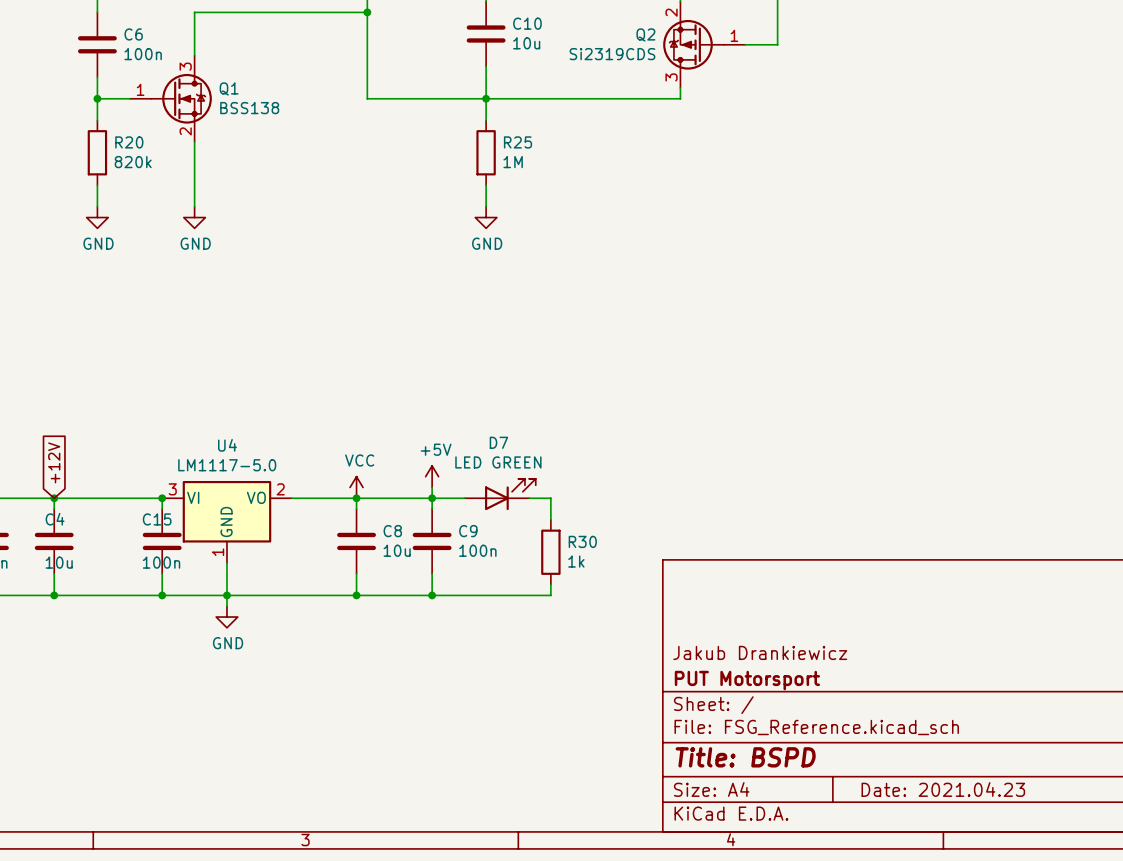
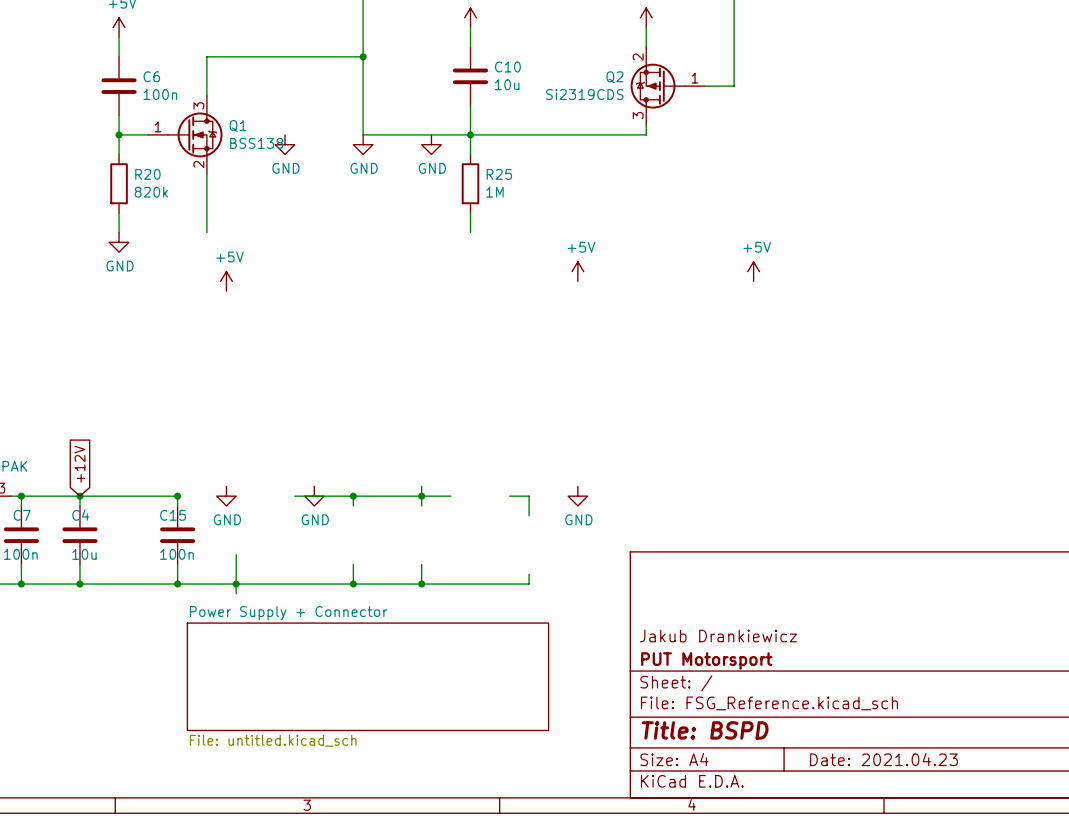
power symbol: none -> GND (285, 144)
power symbol: none -> GND (363, 144)
power symbol: none -> GND (431, 144)
power symbol: GND (194, 217) -> none
power symbol: GND (486, 217) -> none
power symbol: none -> +5V (577, 271)
power symbol: none -> +5V (753, 271)
power symbol: none -> +5V (226, 281)
power symbol: +5V (432, 476) -> none
power symbol: VCC (356, 487) -> none
D7: LED GREEN (500, 494) -> none
power symbol: none -> GND (226, 496)
power symbol: none -> GND (314, 496)
power symbol: none -> GND (577, 496)
U4: LM1117-5.0 (226, 522) -> none
C8: 10u (356, 541) -> none
C9: 100n (432, 541) -> none
R30: 1k (550, 552) -> none
power symbol: GND (226, 617) -> none
sheet Power Supply + Connector: none -> File: untitled.kicad_sch (367, 676)

